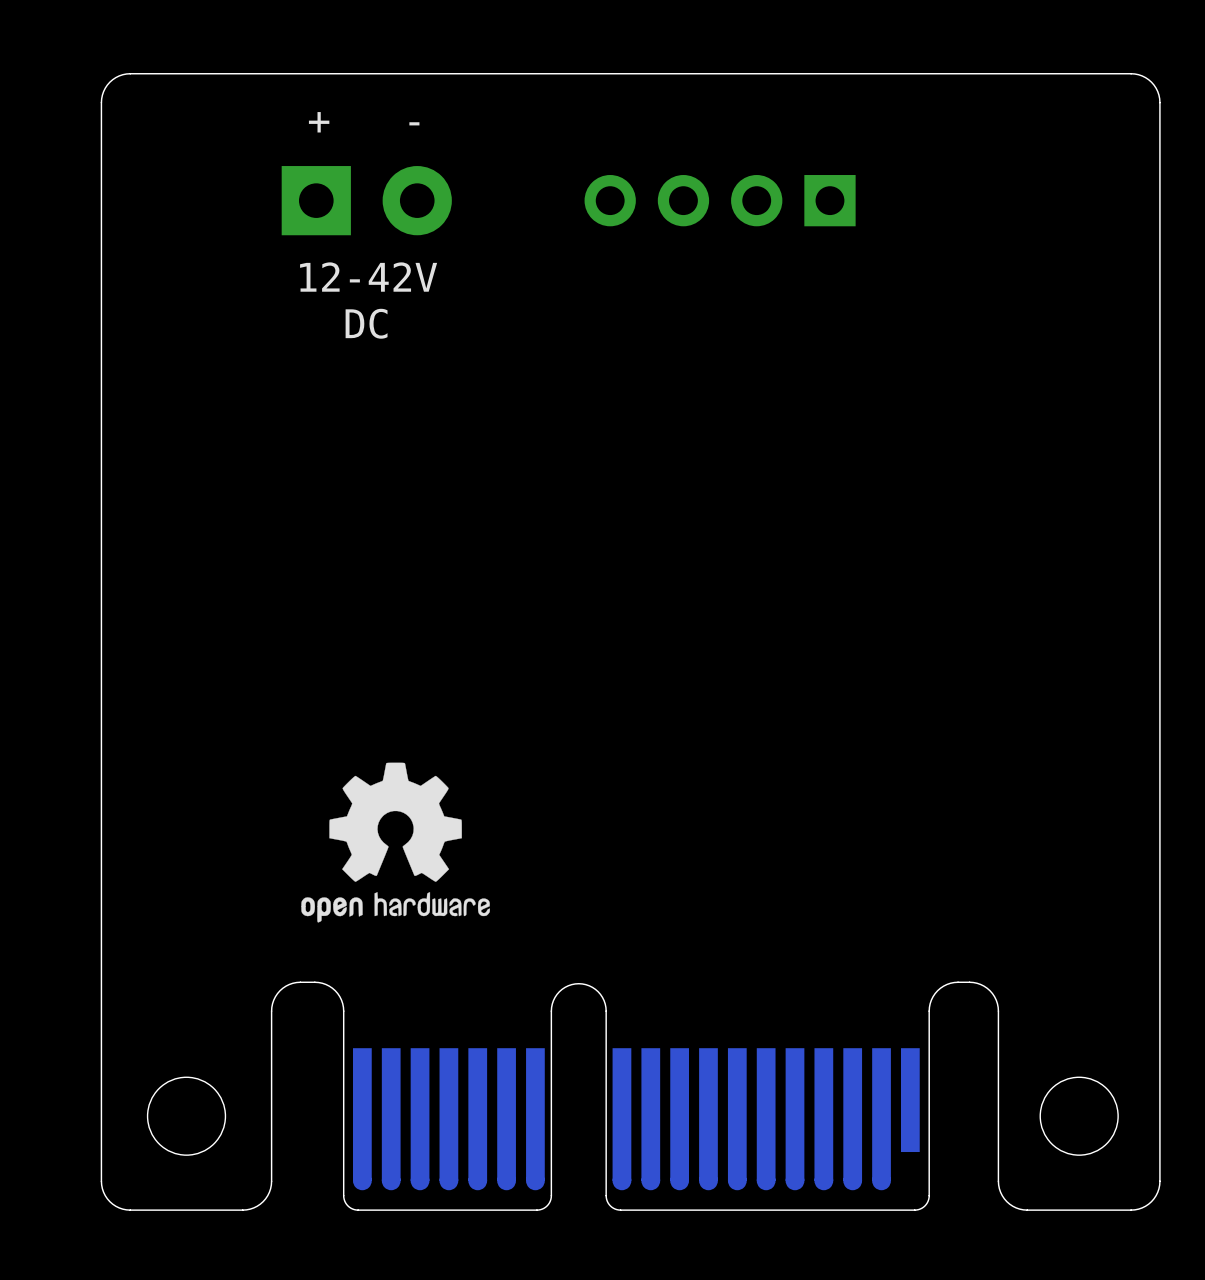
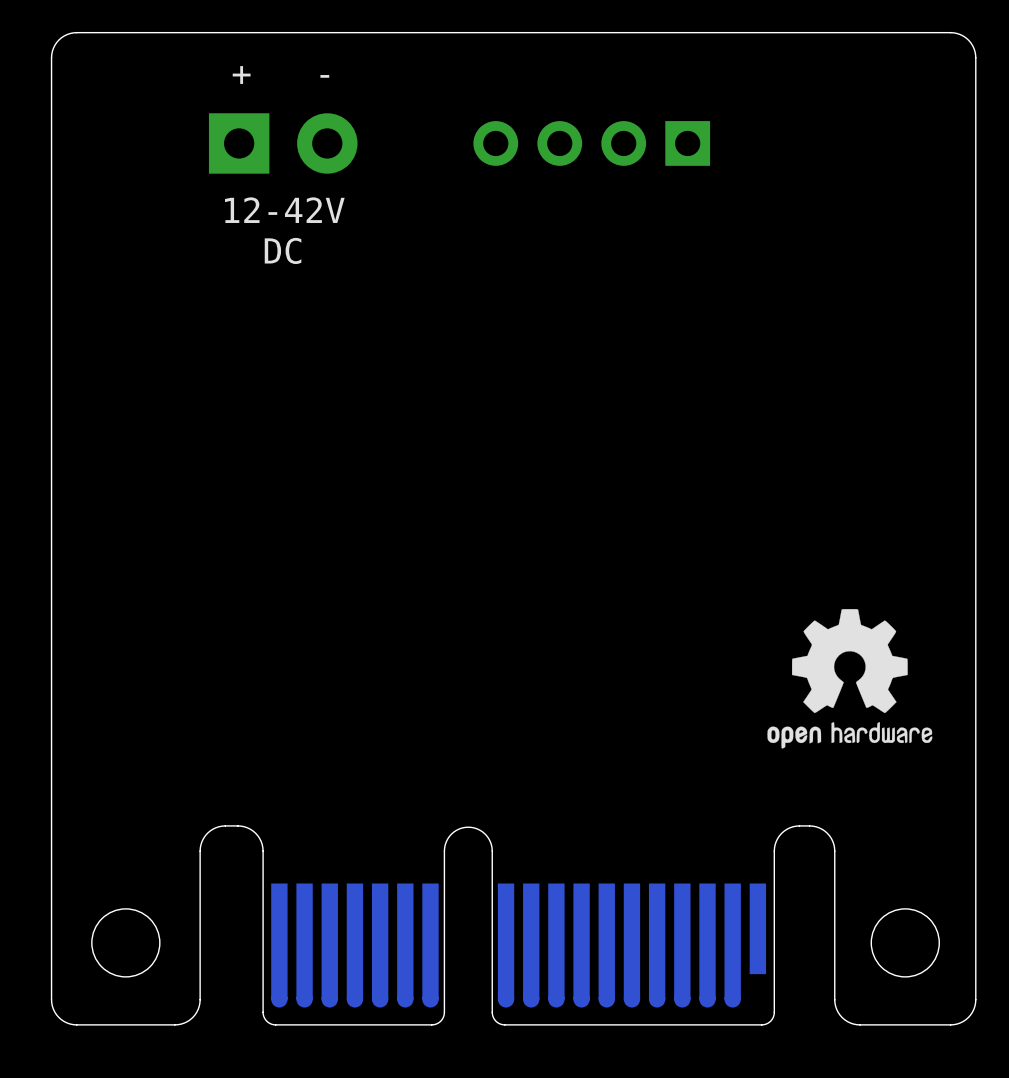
drawing position: (395, 842) -> (849, 678)

